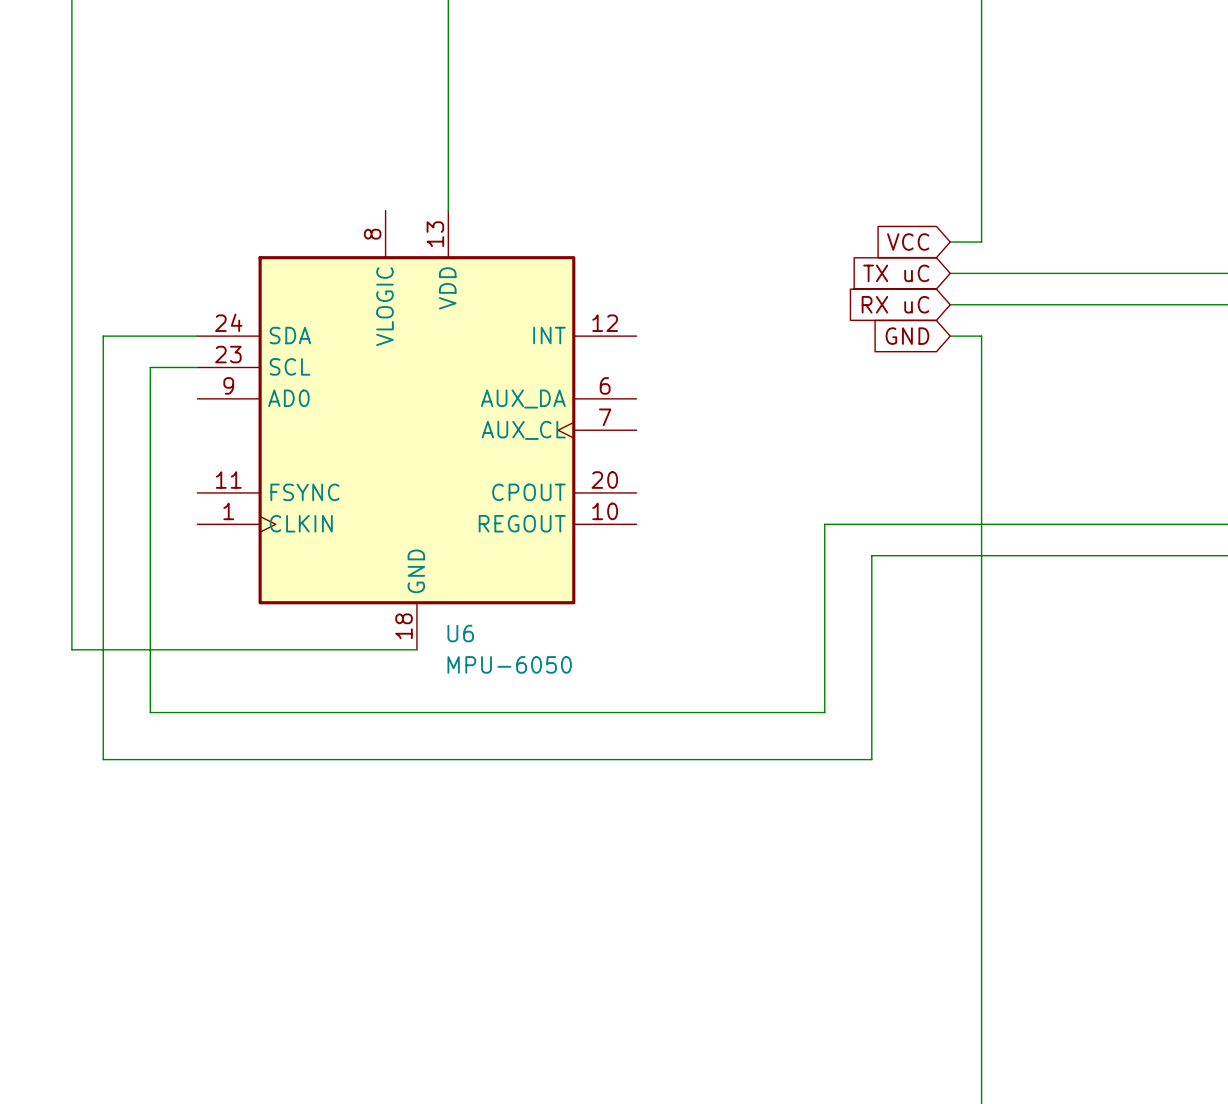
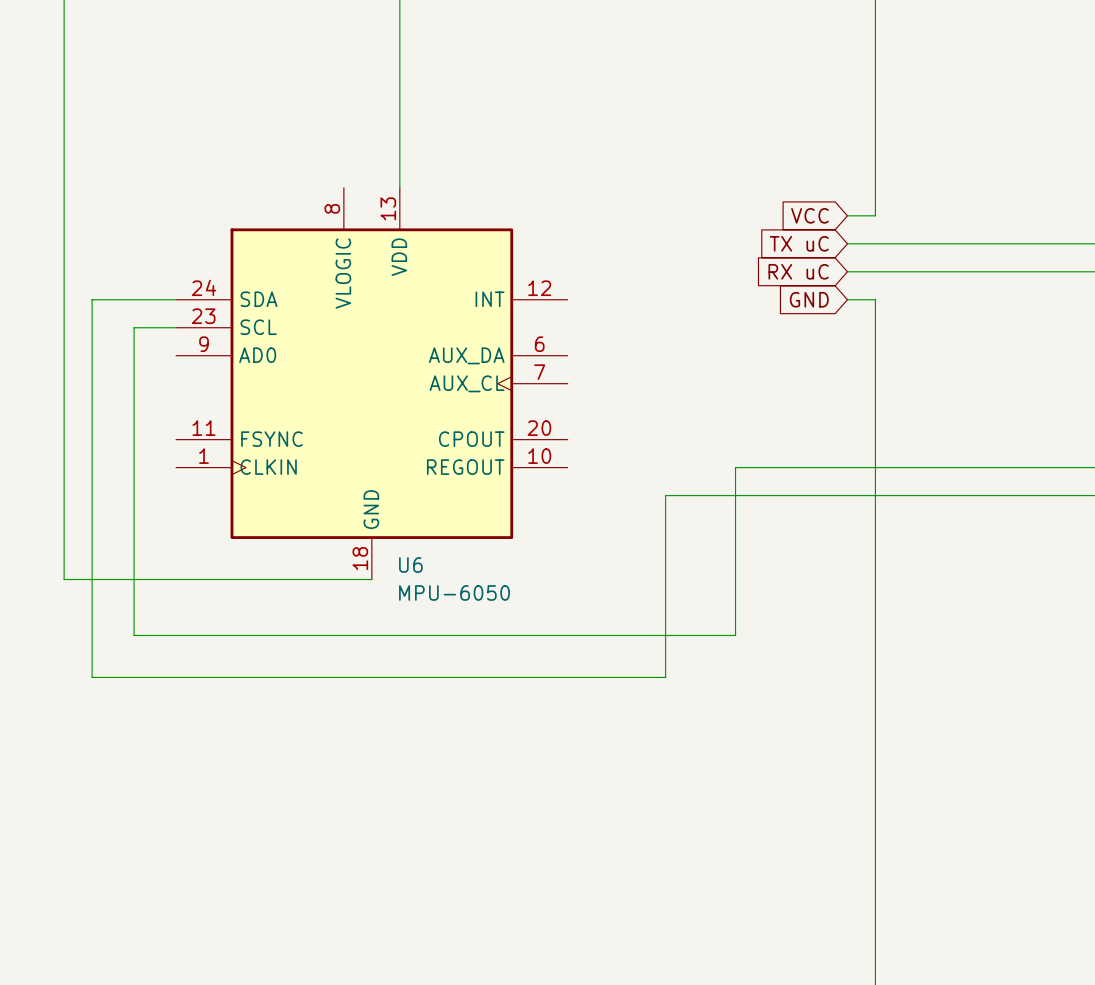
wire: (871, 555) (871, 759) (746, 759) -> (777, 495) (665, 495) (665, 677)

